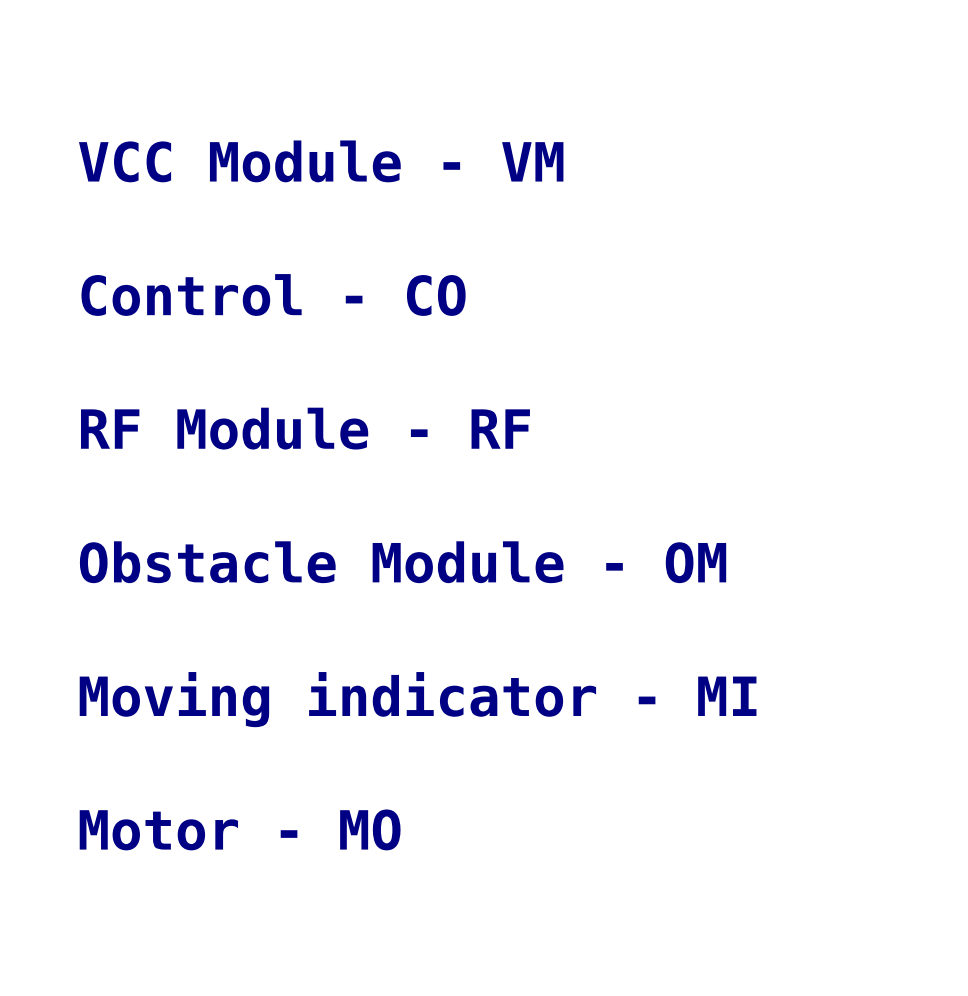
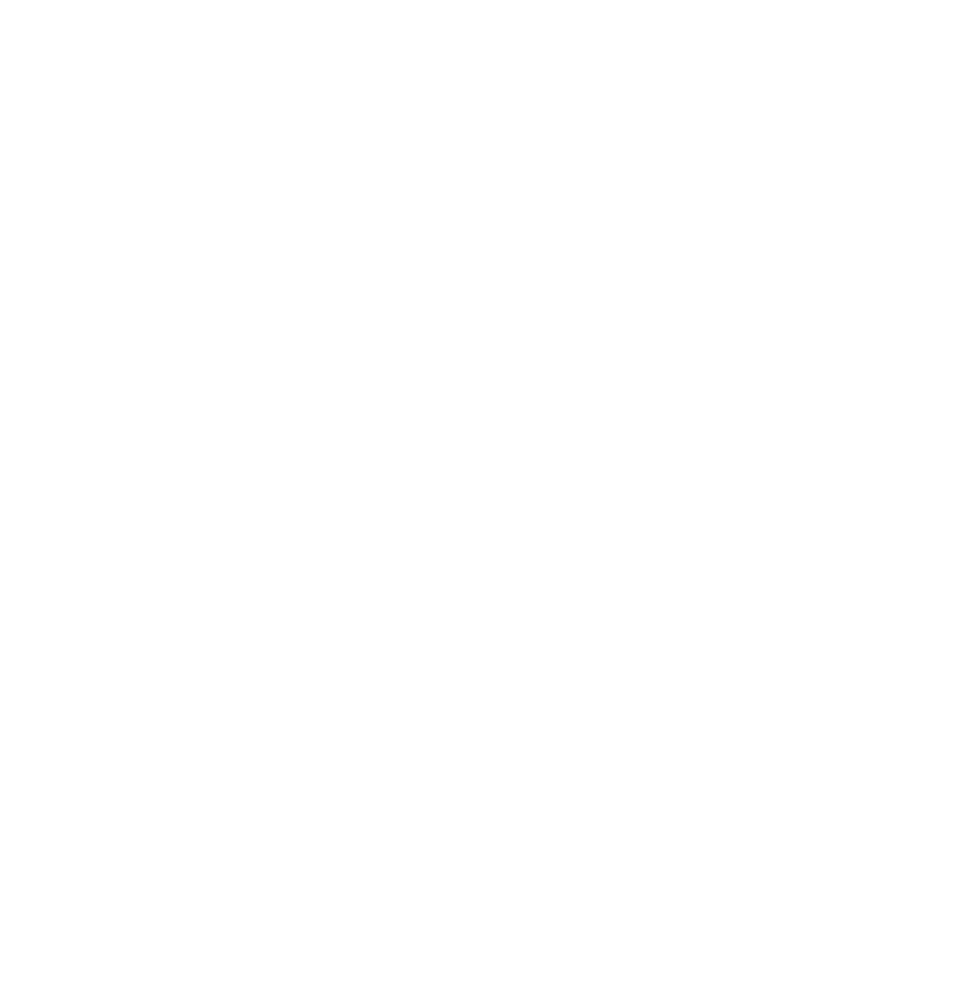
text: VCC Module - VM (321, 161) -> none
text: Control - CO (273, 295) -> none
text: RF Module - RF (305, 428) -> none
text: Obstacle Module - OM (403, 562) -> none
text: Moving indicator - MI (418, 699) -> none
text: Motor - MO (240, 829) -> none

